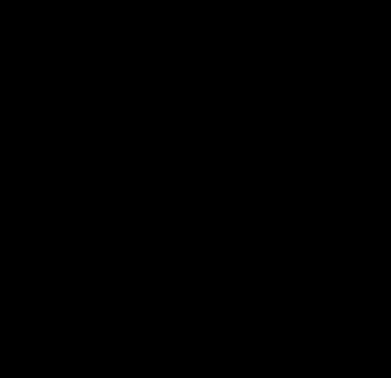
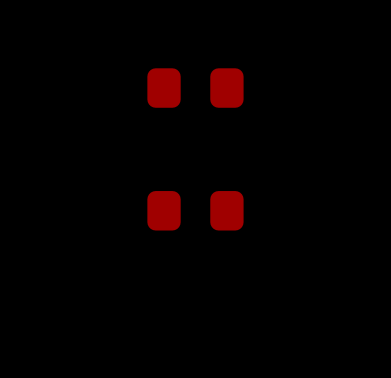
part: none -> (195, 88)
part: none -> (195, 210)

